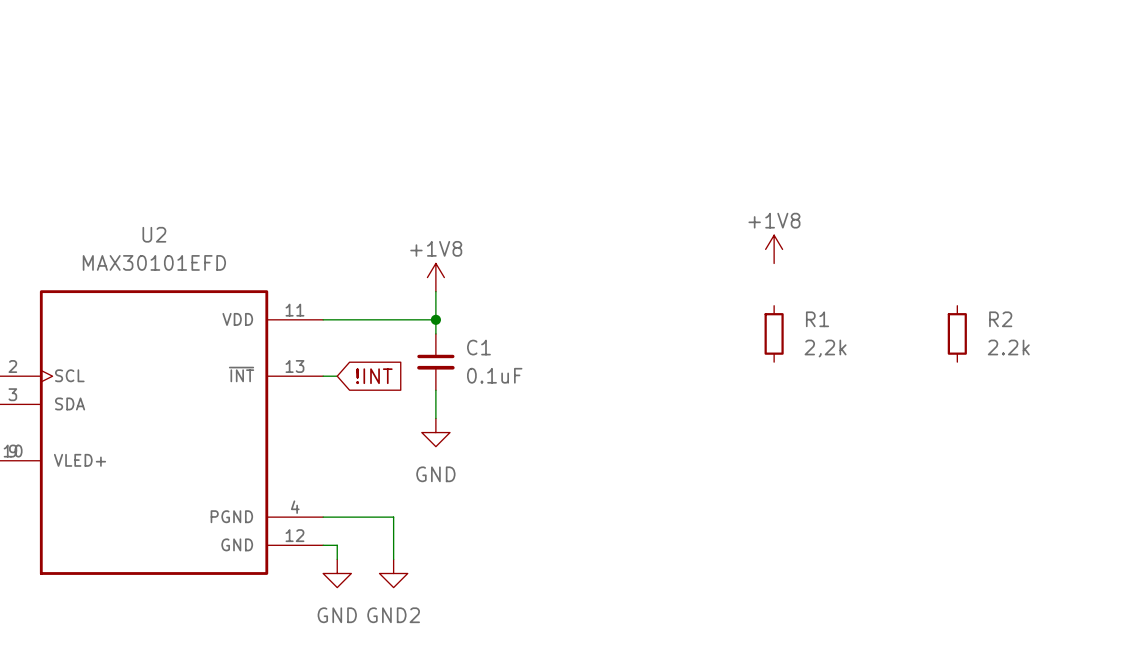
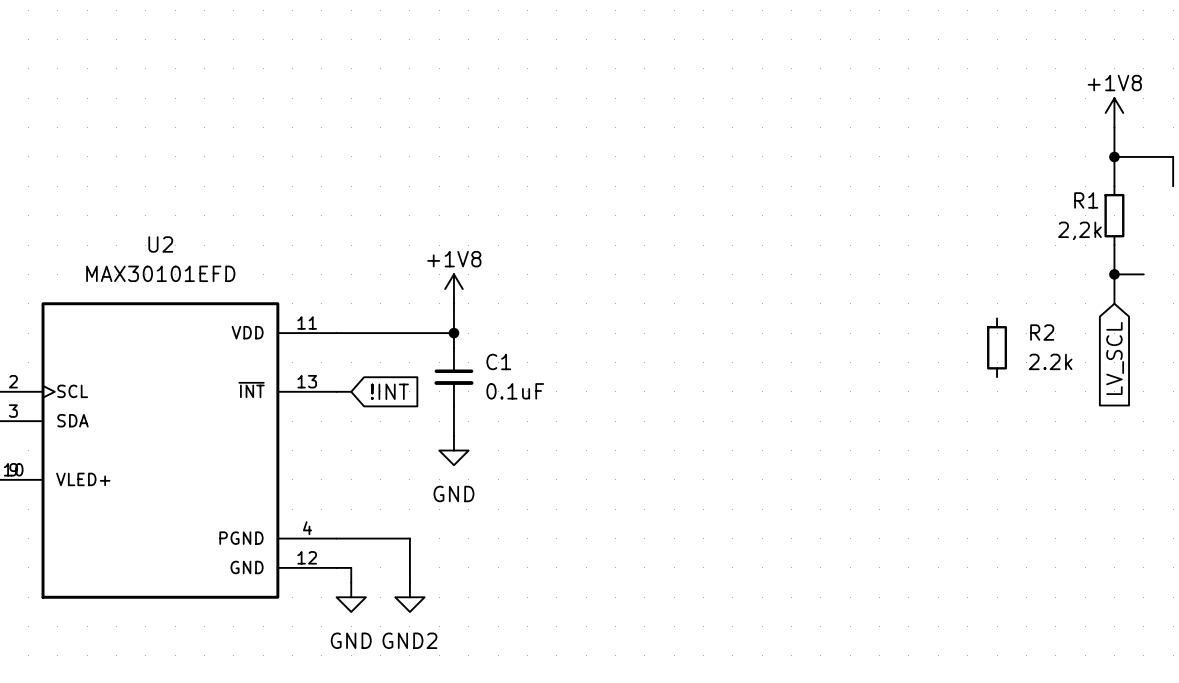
power symbol: none -> +1V8 (1114, 112)
wire: none -> (1114, 127) (1114, 186)
wire: none -> (1114, 156) (1173, 156) (1173, 186)
junction: none -> (1114, 156)
wire: none -> (1114, 245) (1114, 303)
power symbol: +1V8 (774, 249) -> none
wire: none -> (1114, 274) (1143, 274)
junction: none -> (1114, 274)
R1 name position: R1 (817, 319) -> R1 (1086, 200)
R1 position: (774, 333) -> (1114, 215)
global label: none -> LV_SCL (1115, 358)
R1 value position: 2,2k (825, 348) -> 2,2k (1079, 230)

